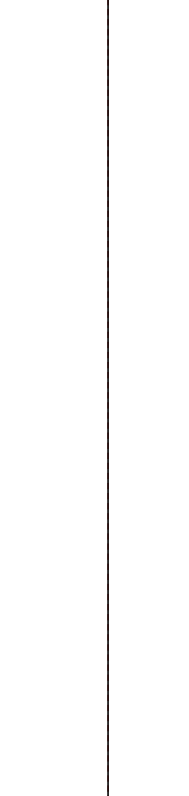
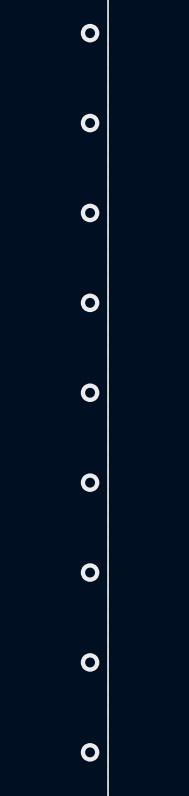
via: none -> (90, 33)
via: none -> (90, 123)
via: none -> (90, 212)
via: none -> (90, 302)
via: none -> (90, 392)
via: none -> (90, 482)
via: none -> (90, 572)
via: none -> (90, 662)
via: none -> (90, 752)

